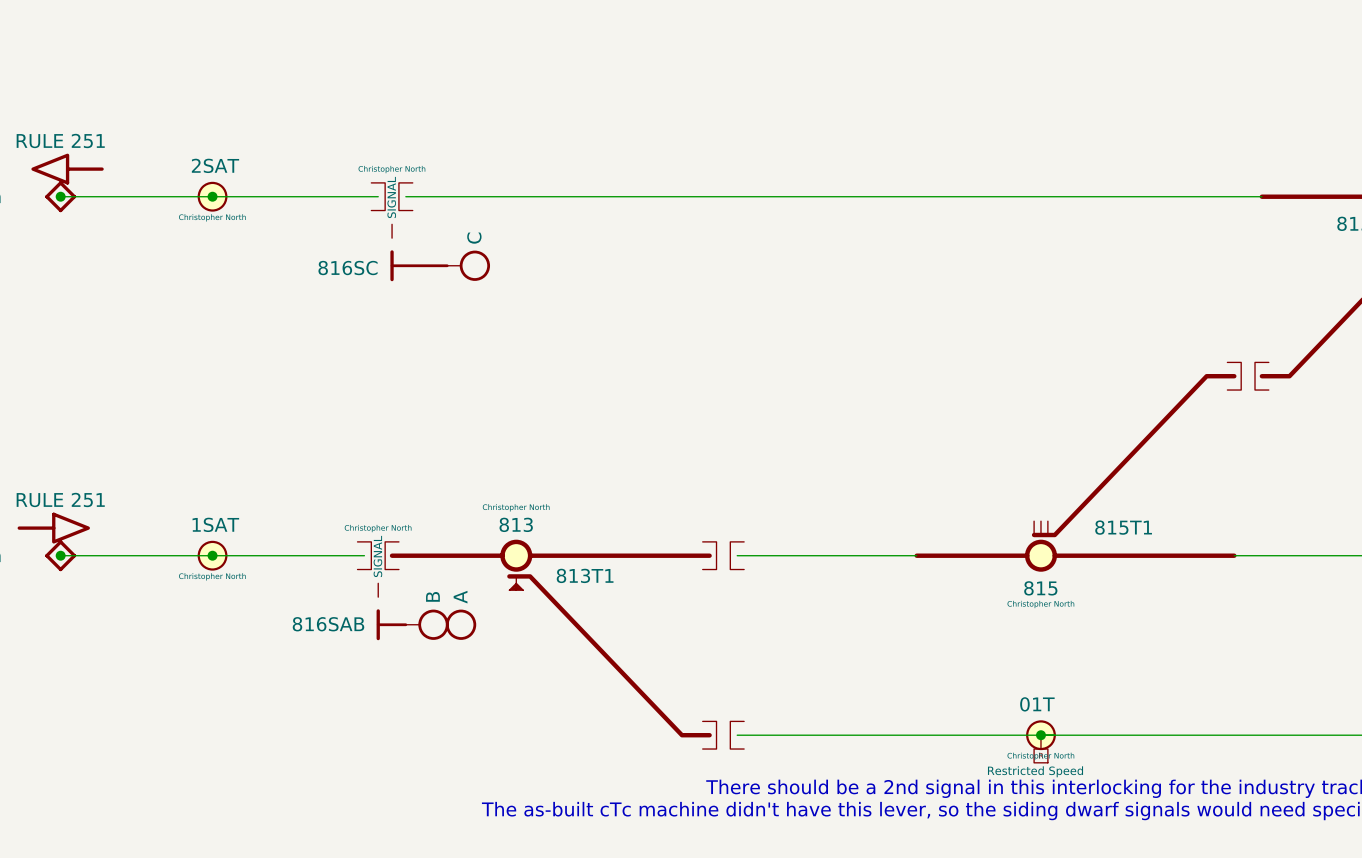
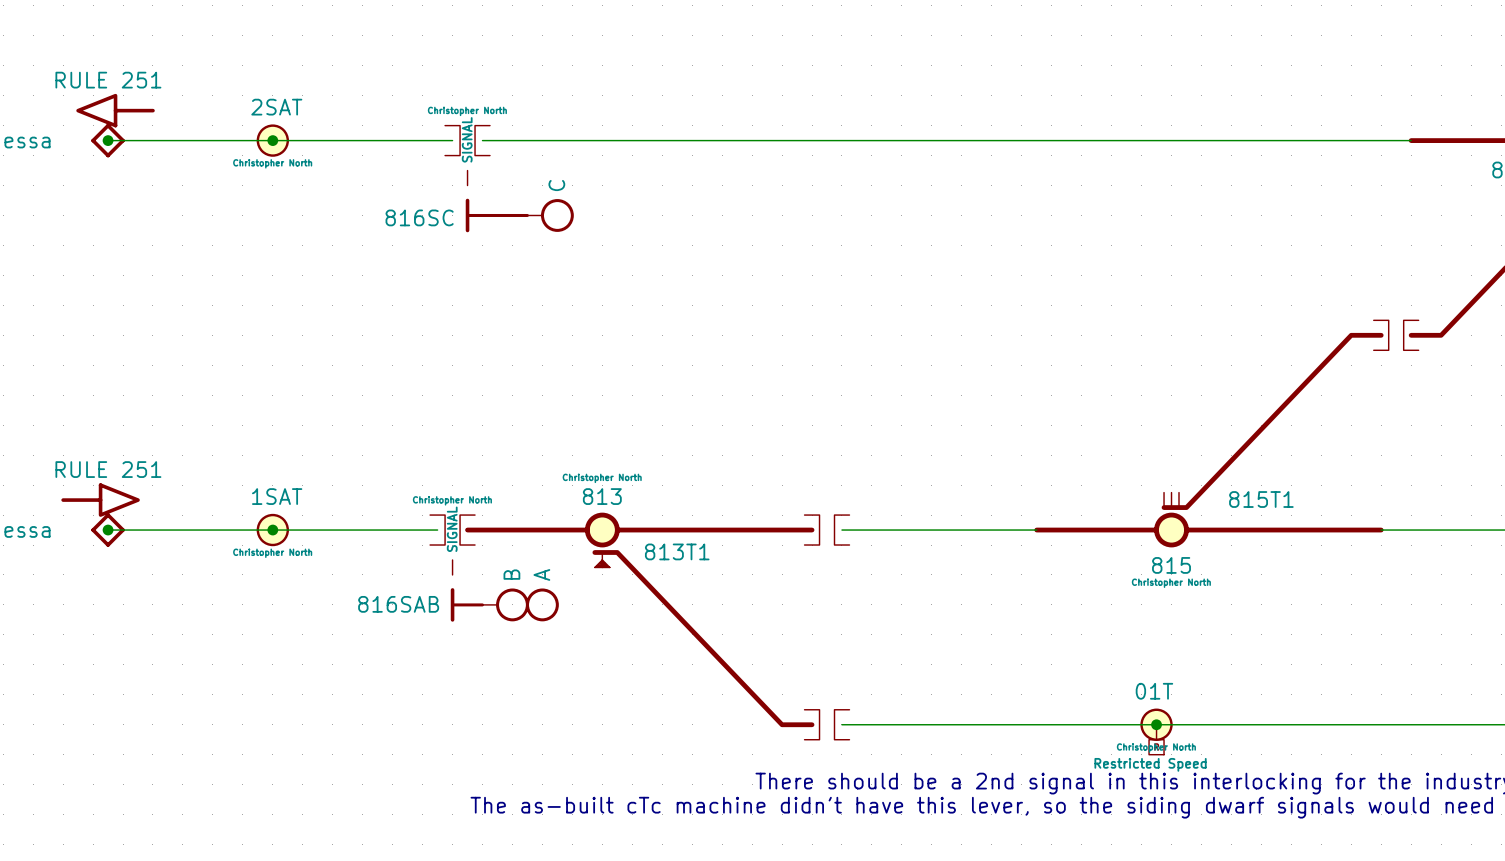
junction position: (1040, 735) -> (1156, 724)
part position: (1040, 735) -> (1156, 724)
part position: (1040, 749) -> (1156, 739)

